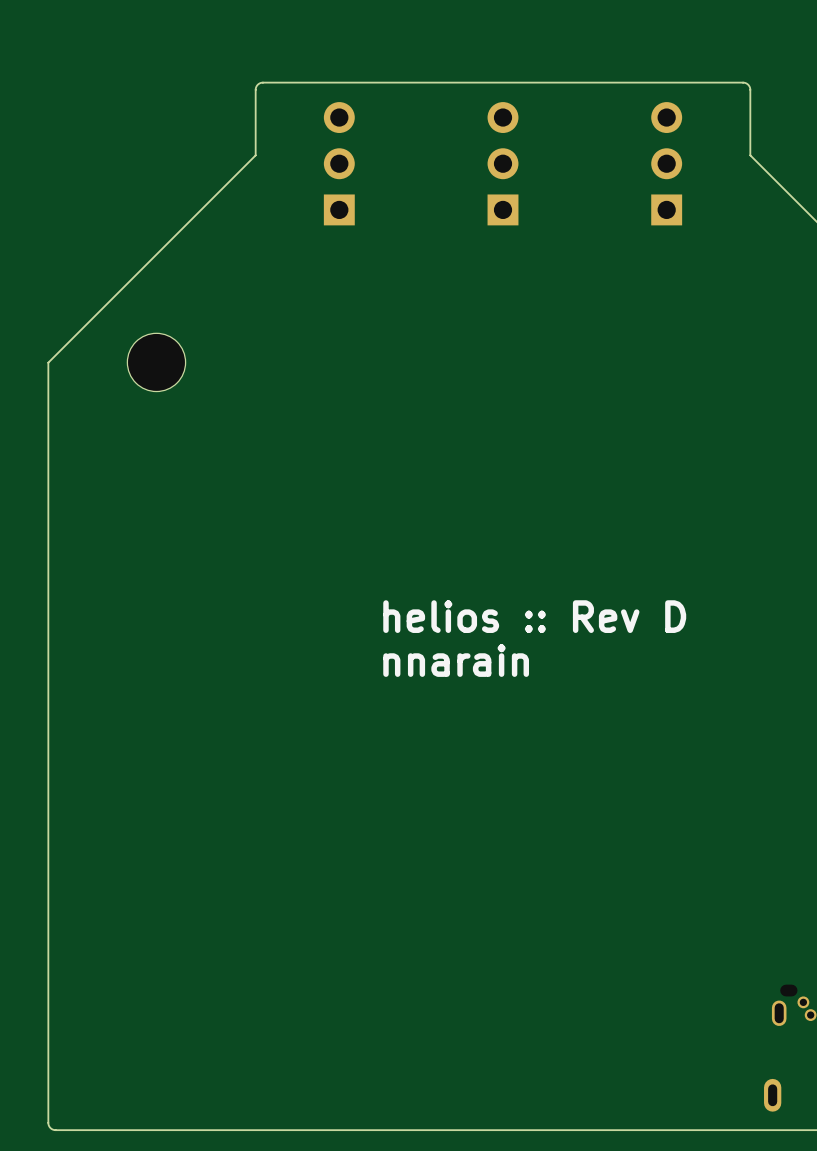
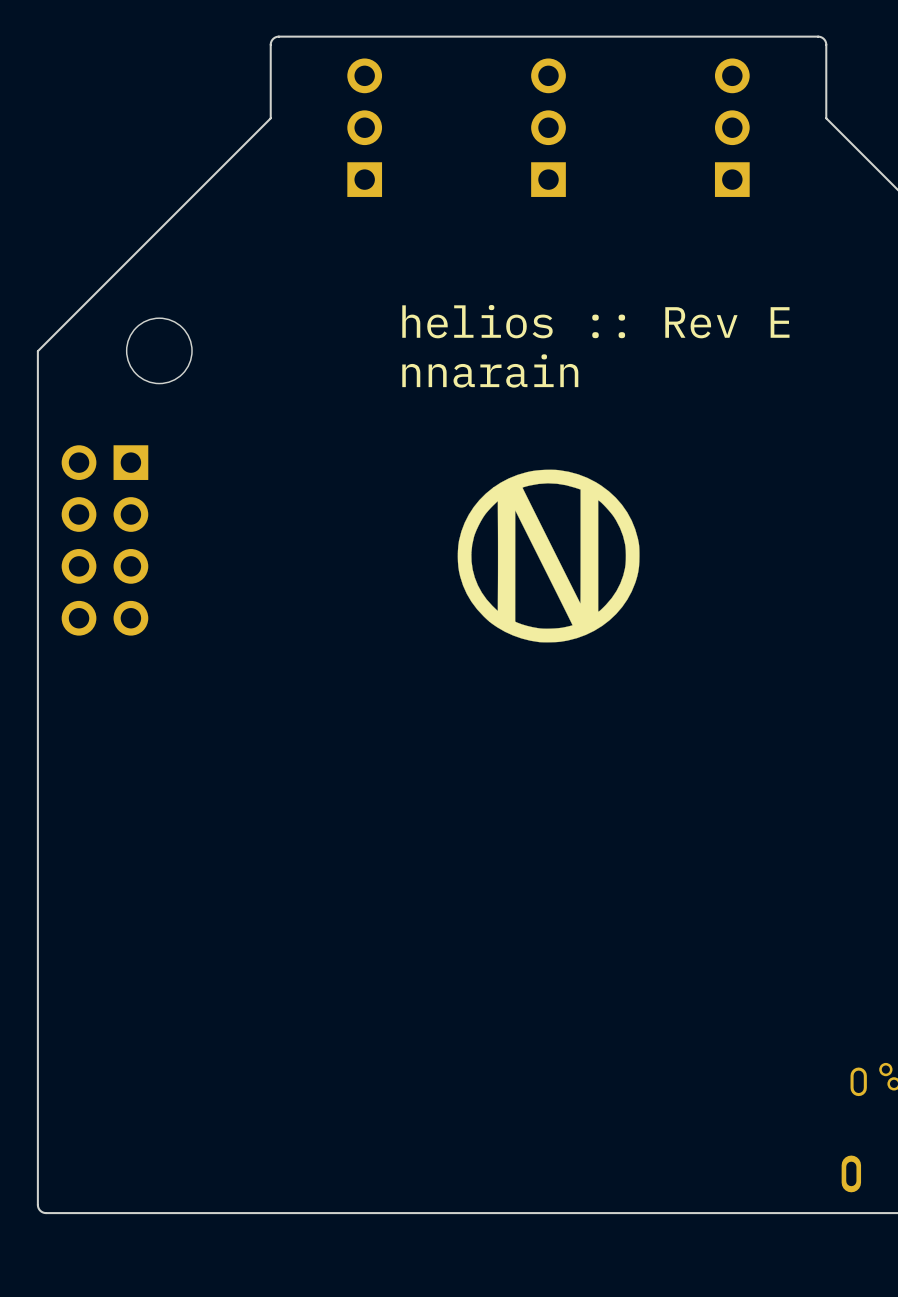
text: none -> helios :: Rev E (595, 321)
drawing: none -> [457, 469, 640, 643]
part: none -> (104, 540)
text: helios :: Rev D (534, 616) -> none
text position: nnarain (456, 660) -> nnarain (490, 370)

